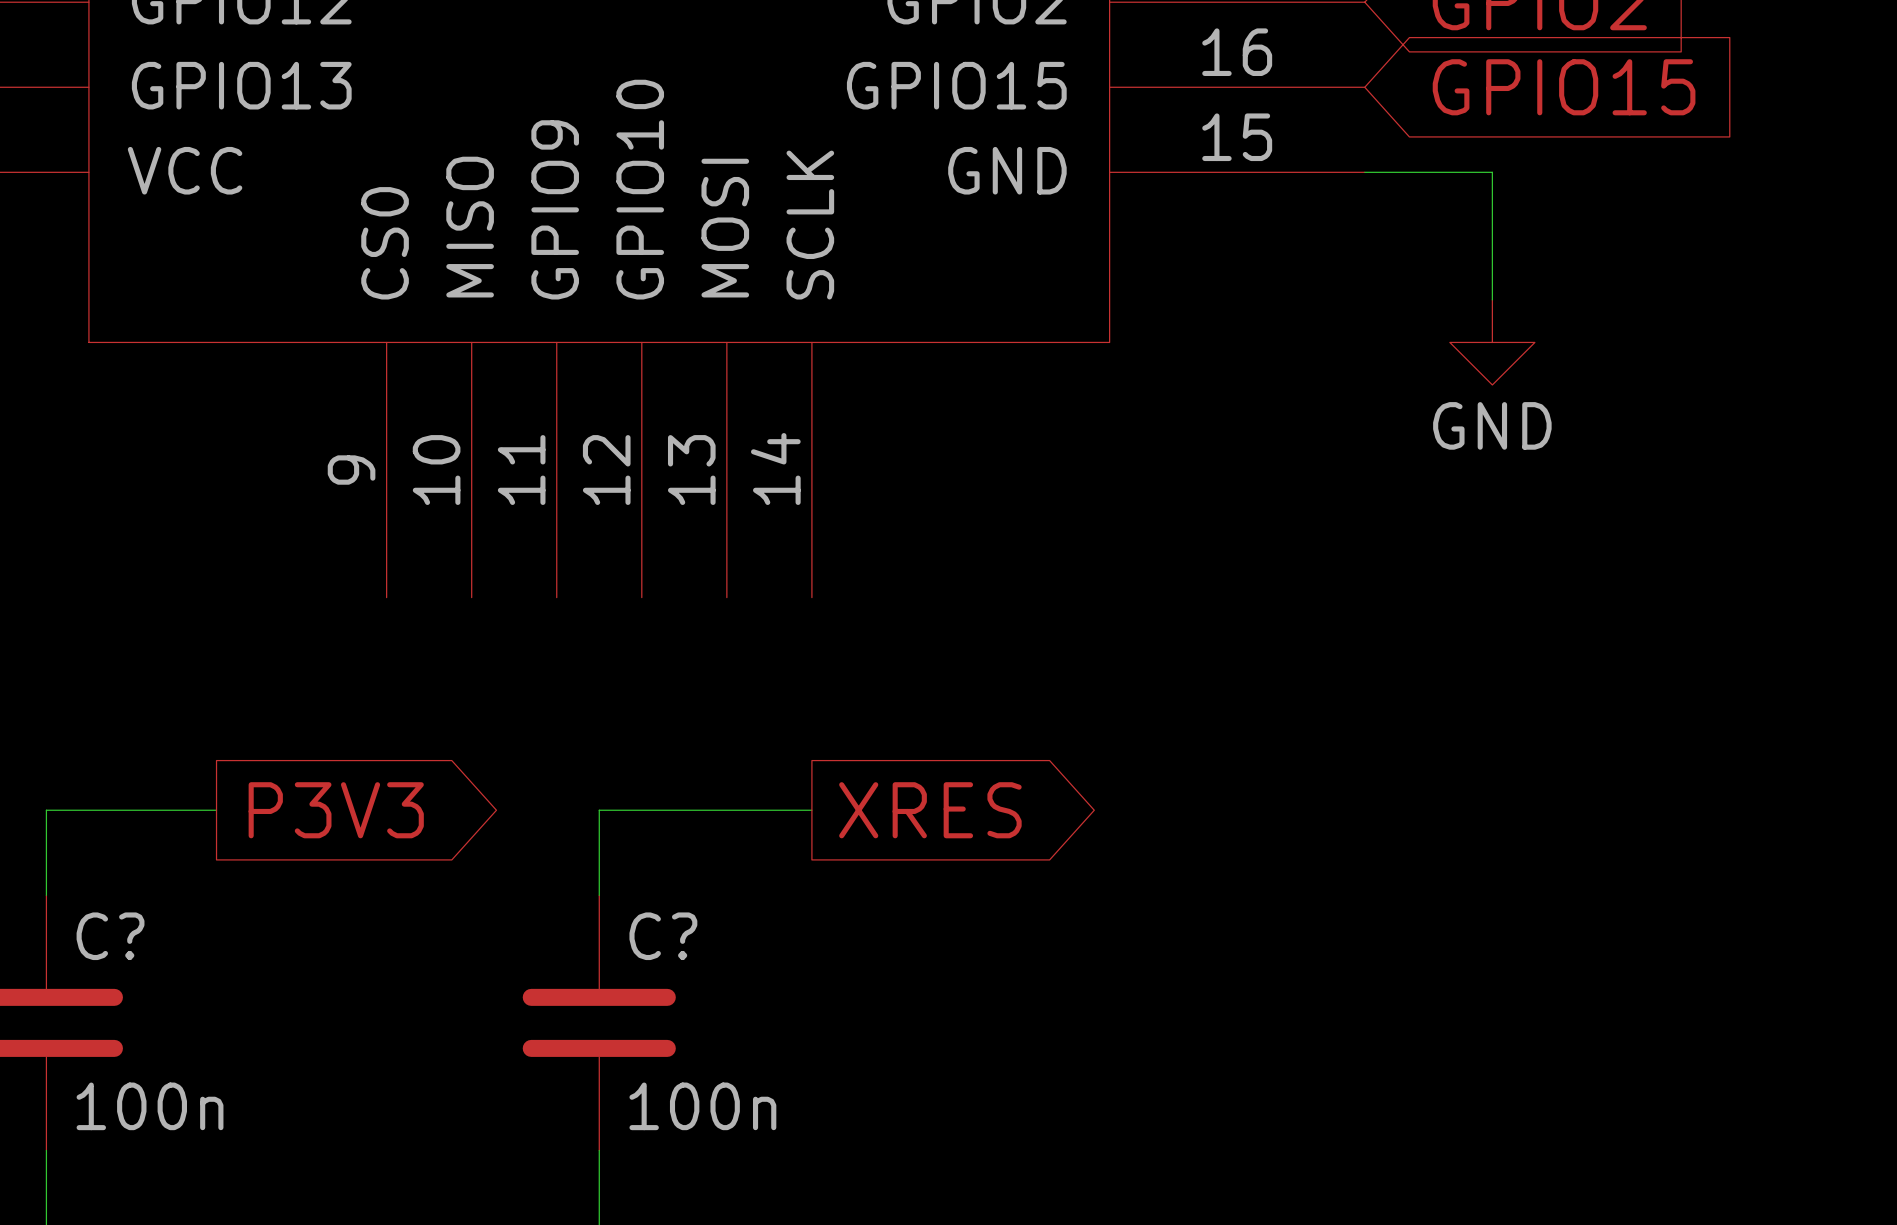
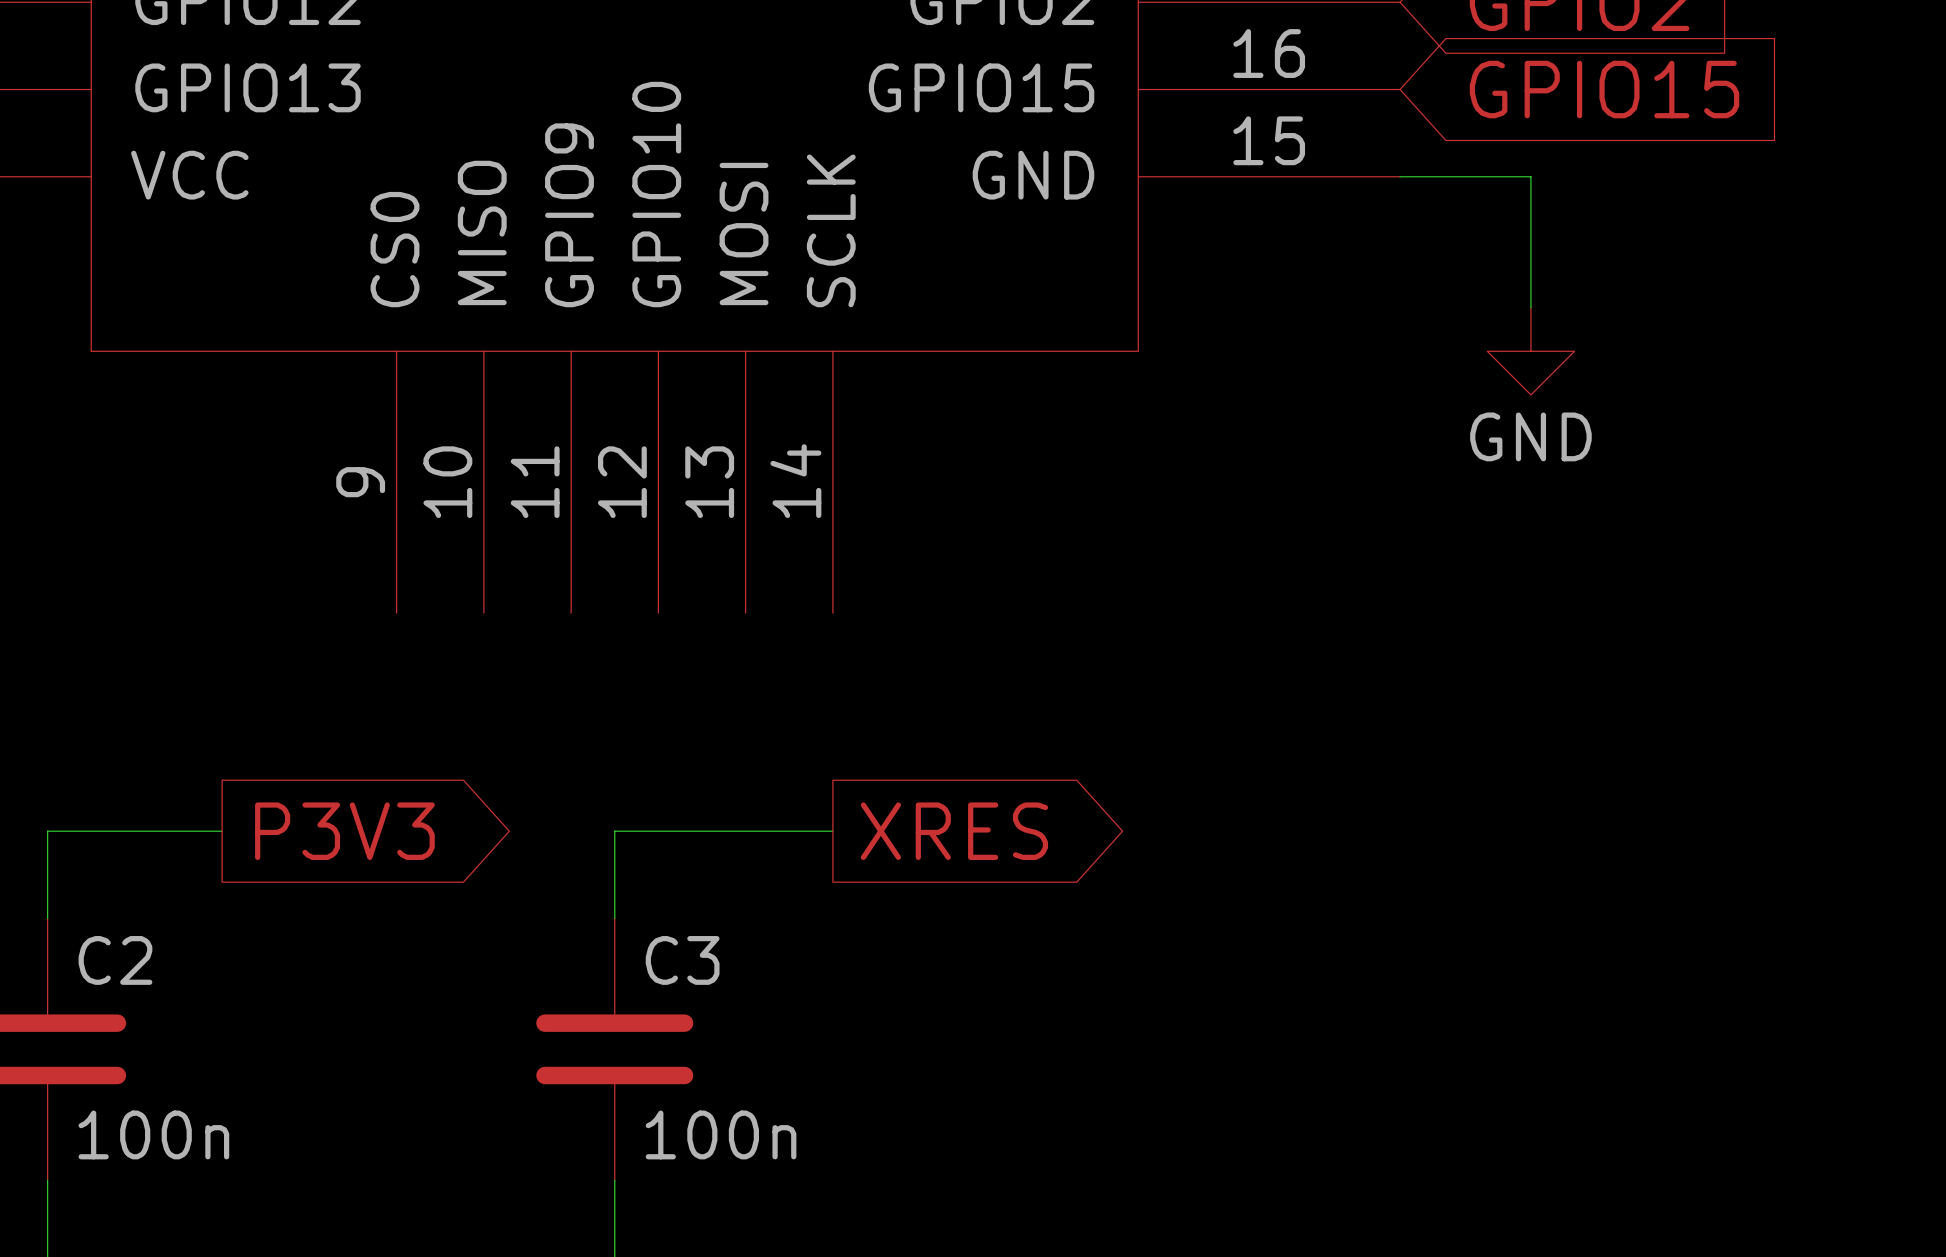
C? name: C? (110, 936) -> C2 (115, 960)
C? name: C? (663, 936) -> C3 (682, 960)

